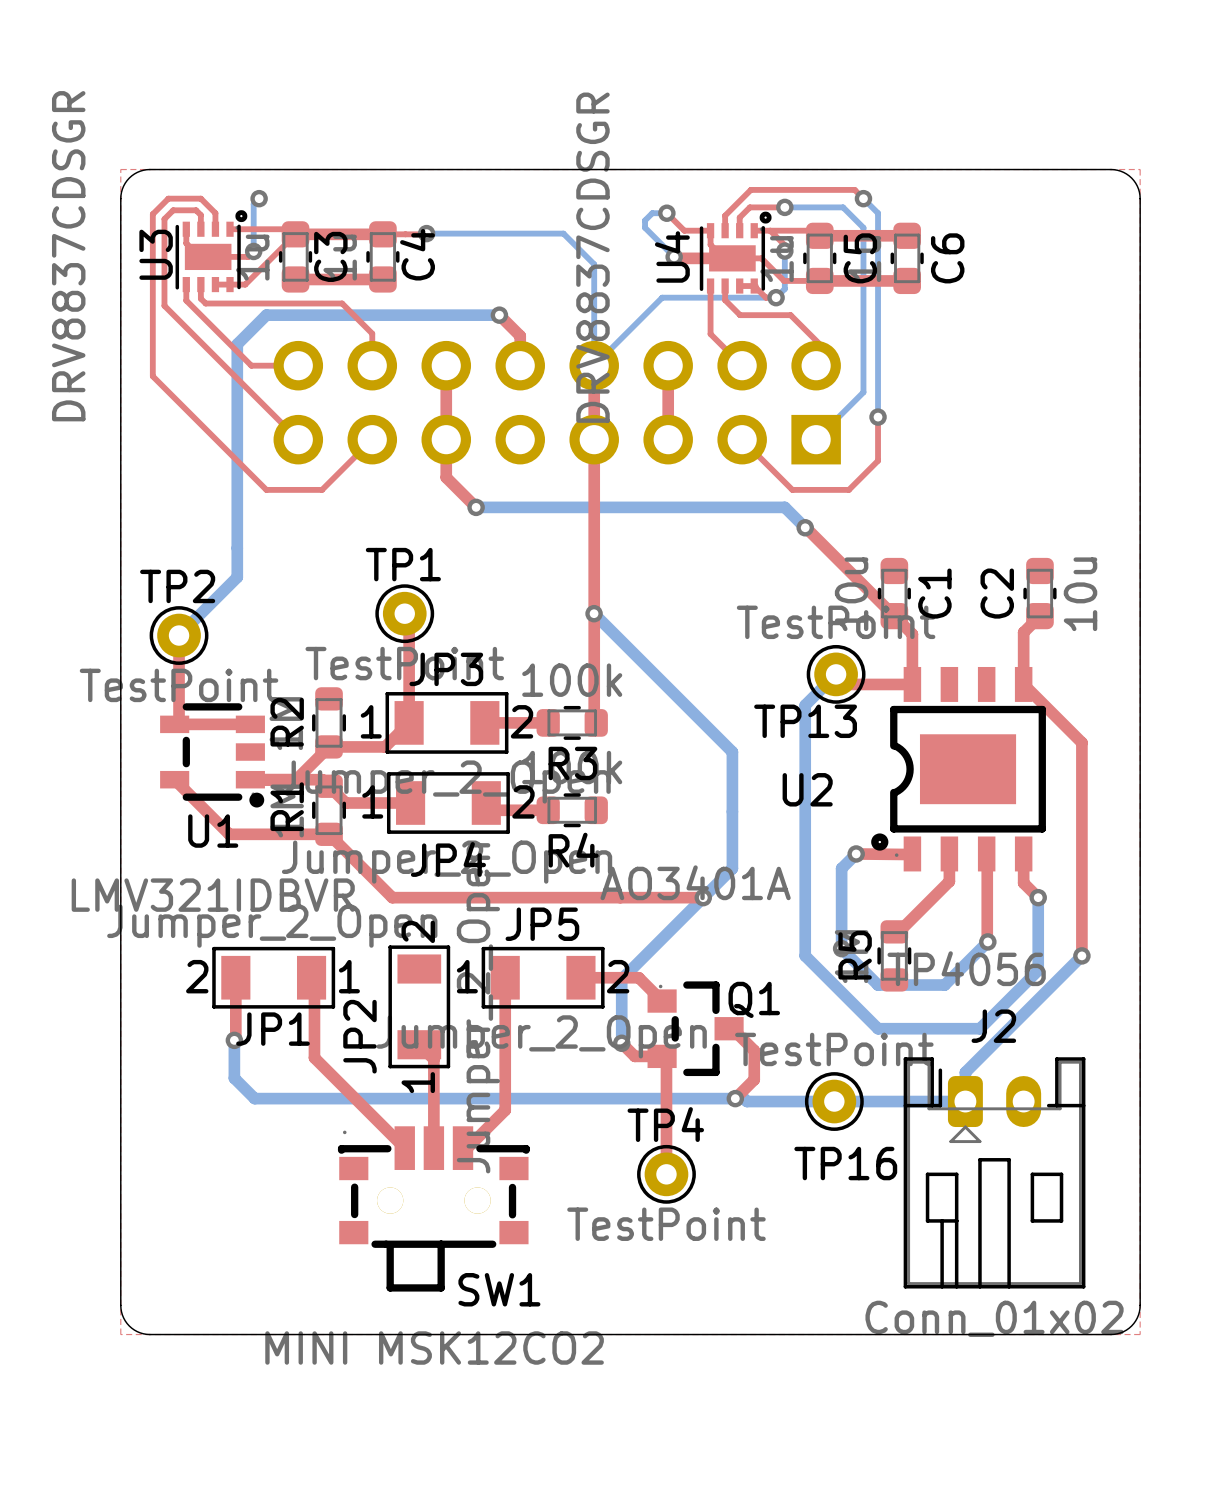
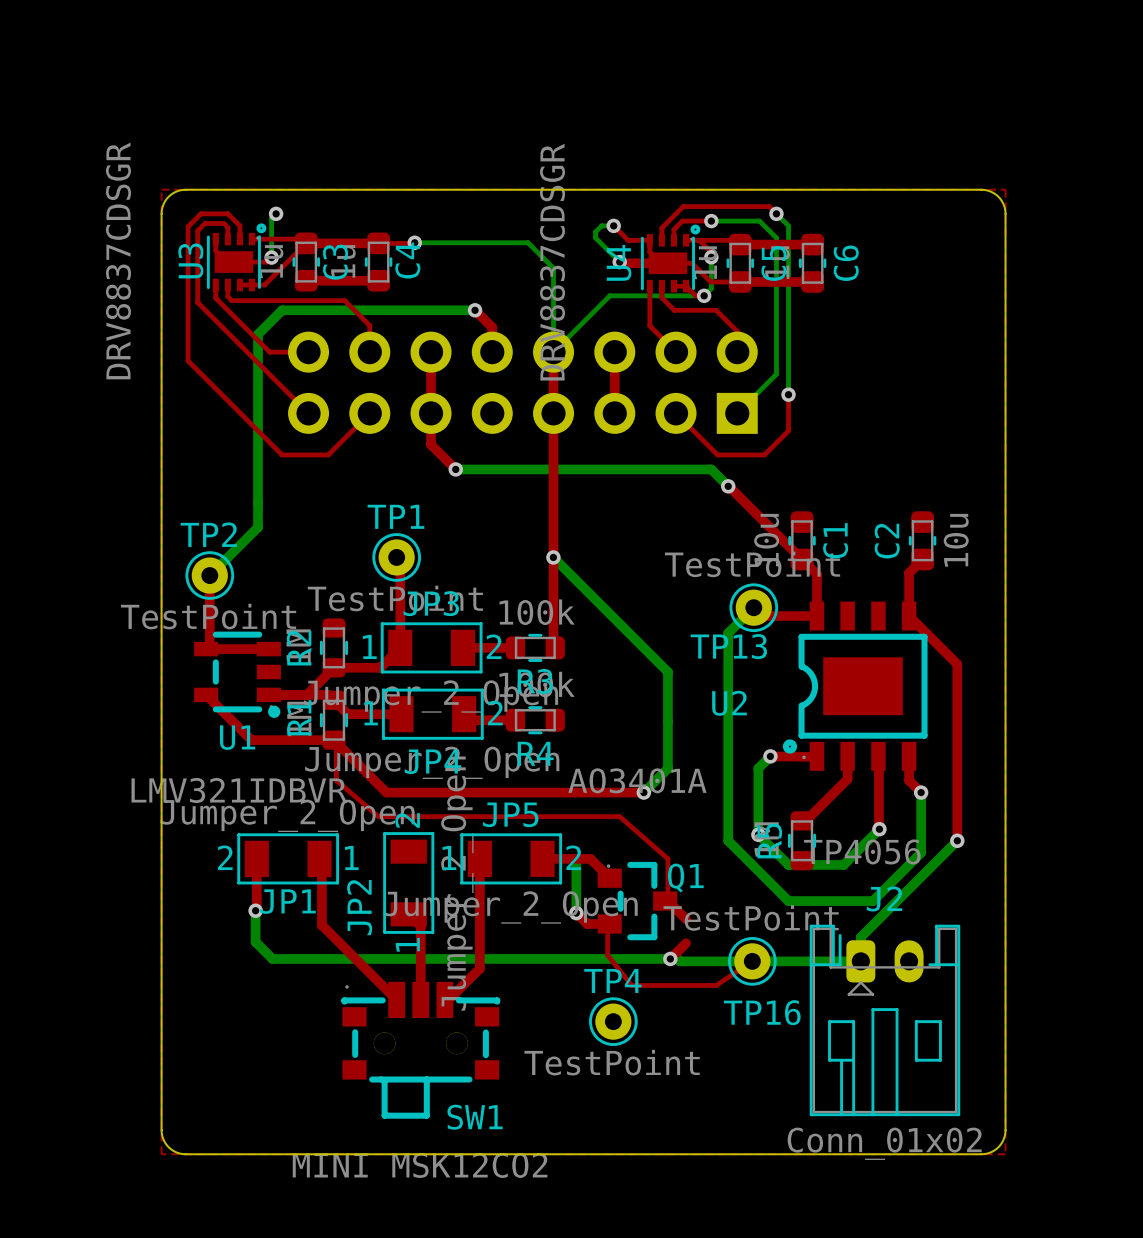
top track: none -> (336, 744) (336, 780) (378, 816) (619, 816) (667, 858) (667, 901)
bottom track: (703, 897) (621, 979) -> none
top track: (754, 1050) (754, 1079) -> none
top track: none -> (607, 925) (607, 955) (631, 985) (716, 985) (752, 961)
top track: (666, 1060) (666, 1174) -> none

